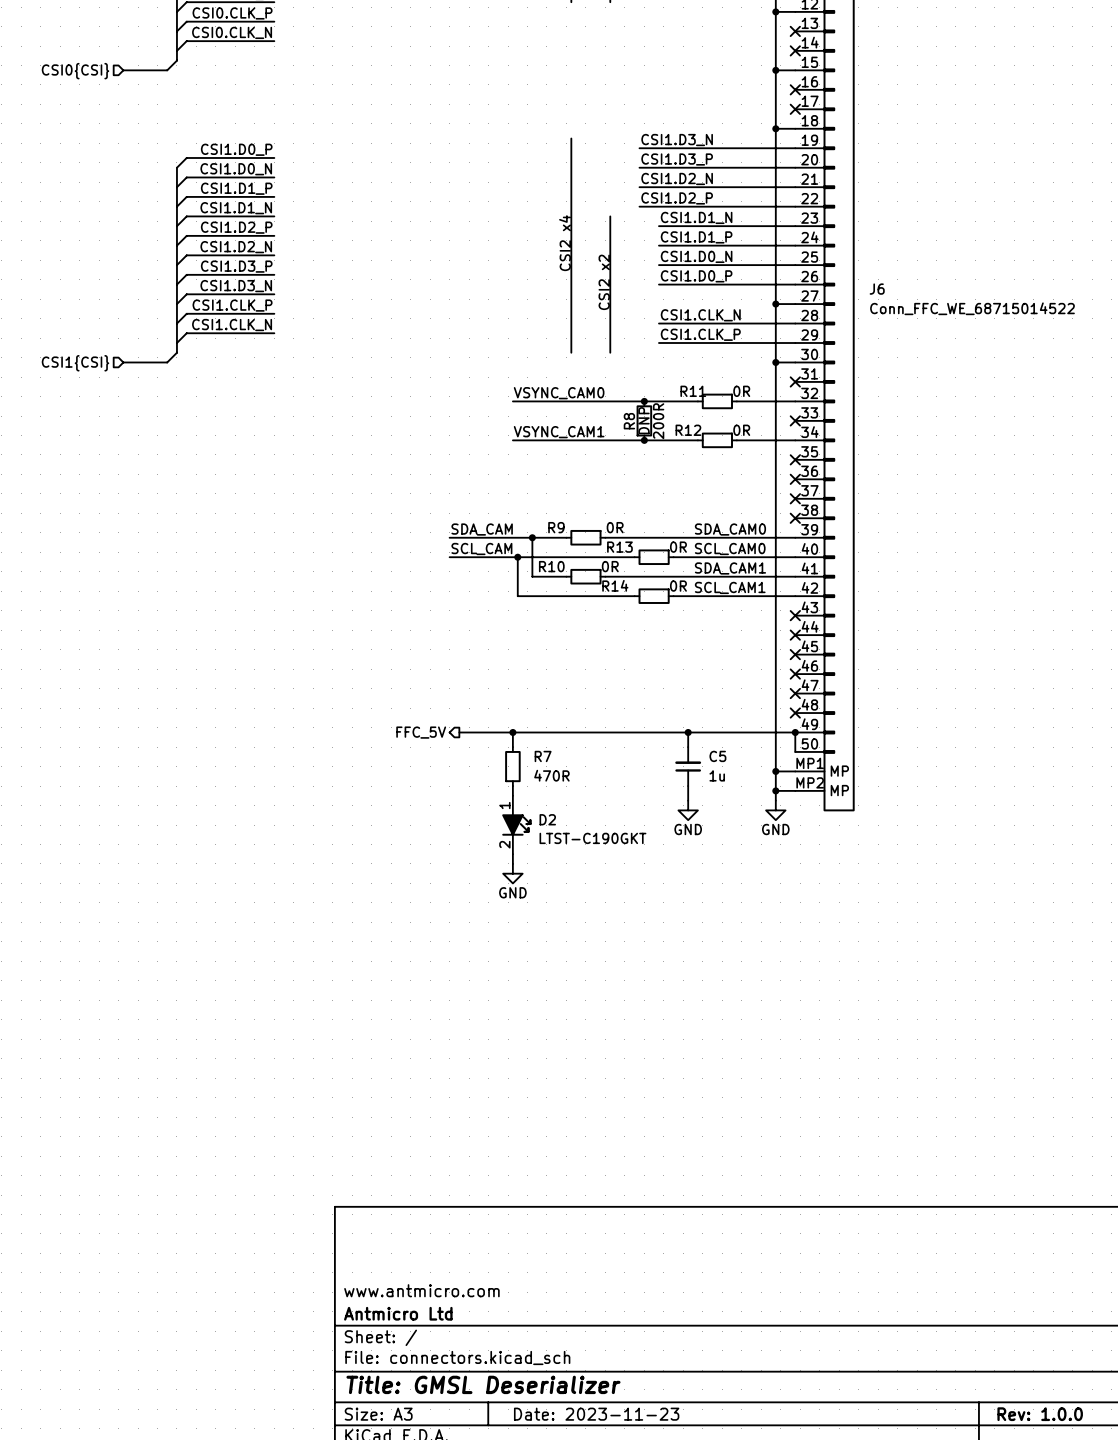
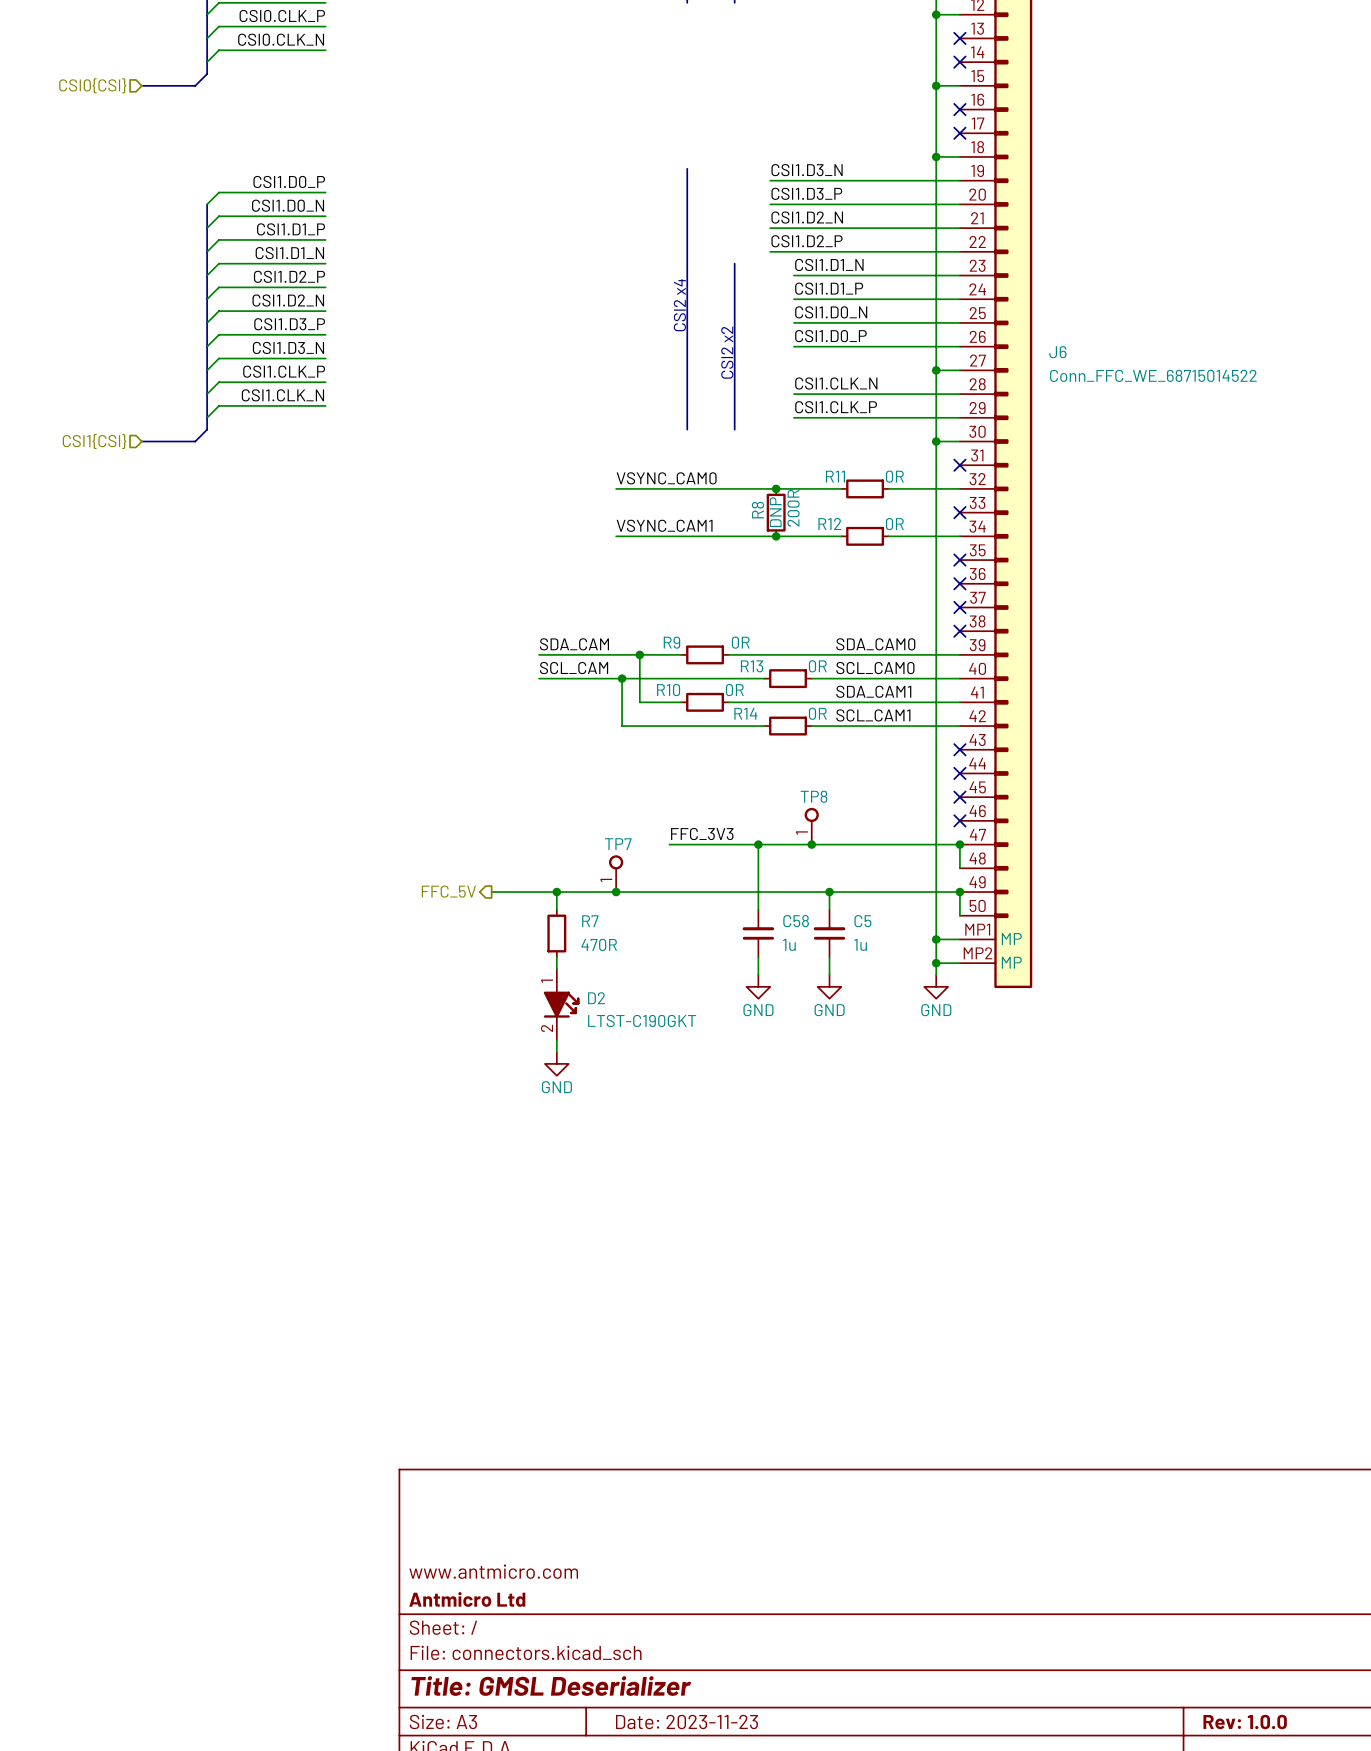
TP8: none -> (811, 826)
label: none -> FFC_3V3 (702, 834)
wire: none -> (669, 844) (959, 844) (959, 868)
wire: none -> (758, 844) (758, 909)
junction: none -> (758, 844)
junction: none -> (811, 844)
no-connect mark: (795, 693) -> none
junction: none -> (959, 844)
no-connect mark: (795, 713) -> none
TP7: none -> (616, 873)
wire: none -> (491, 892) (550, 892)
hierarchical label position: FFC_5V (421, 732) -> FFC_5V (448, 891)
junction: none -> (556, 892)
wire: (512, 732) (512, 747) -> (556, 892) (556, 909)
R7 position: (512, 766) -> (556, 933)
C58: none -> (758, 933)
wire: (512, 786) (512, 795) -> (556, 957) (556, 969)
wire: none -> (758, 957) (758, 975)
power symbol: none -> GND (758, 986)
D2 position: (516, 825) -> (561, 1004)
wire: (512, 854) (512, 863) -> (556, 1040) (556, 1052)
power symbol position: GND (512, 873) -> GND (556, 1063)

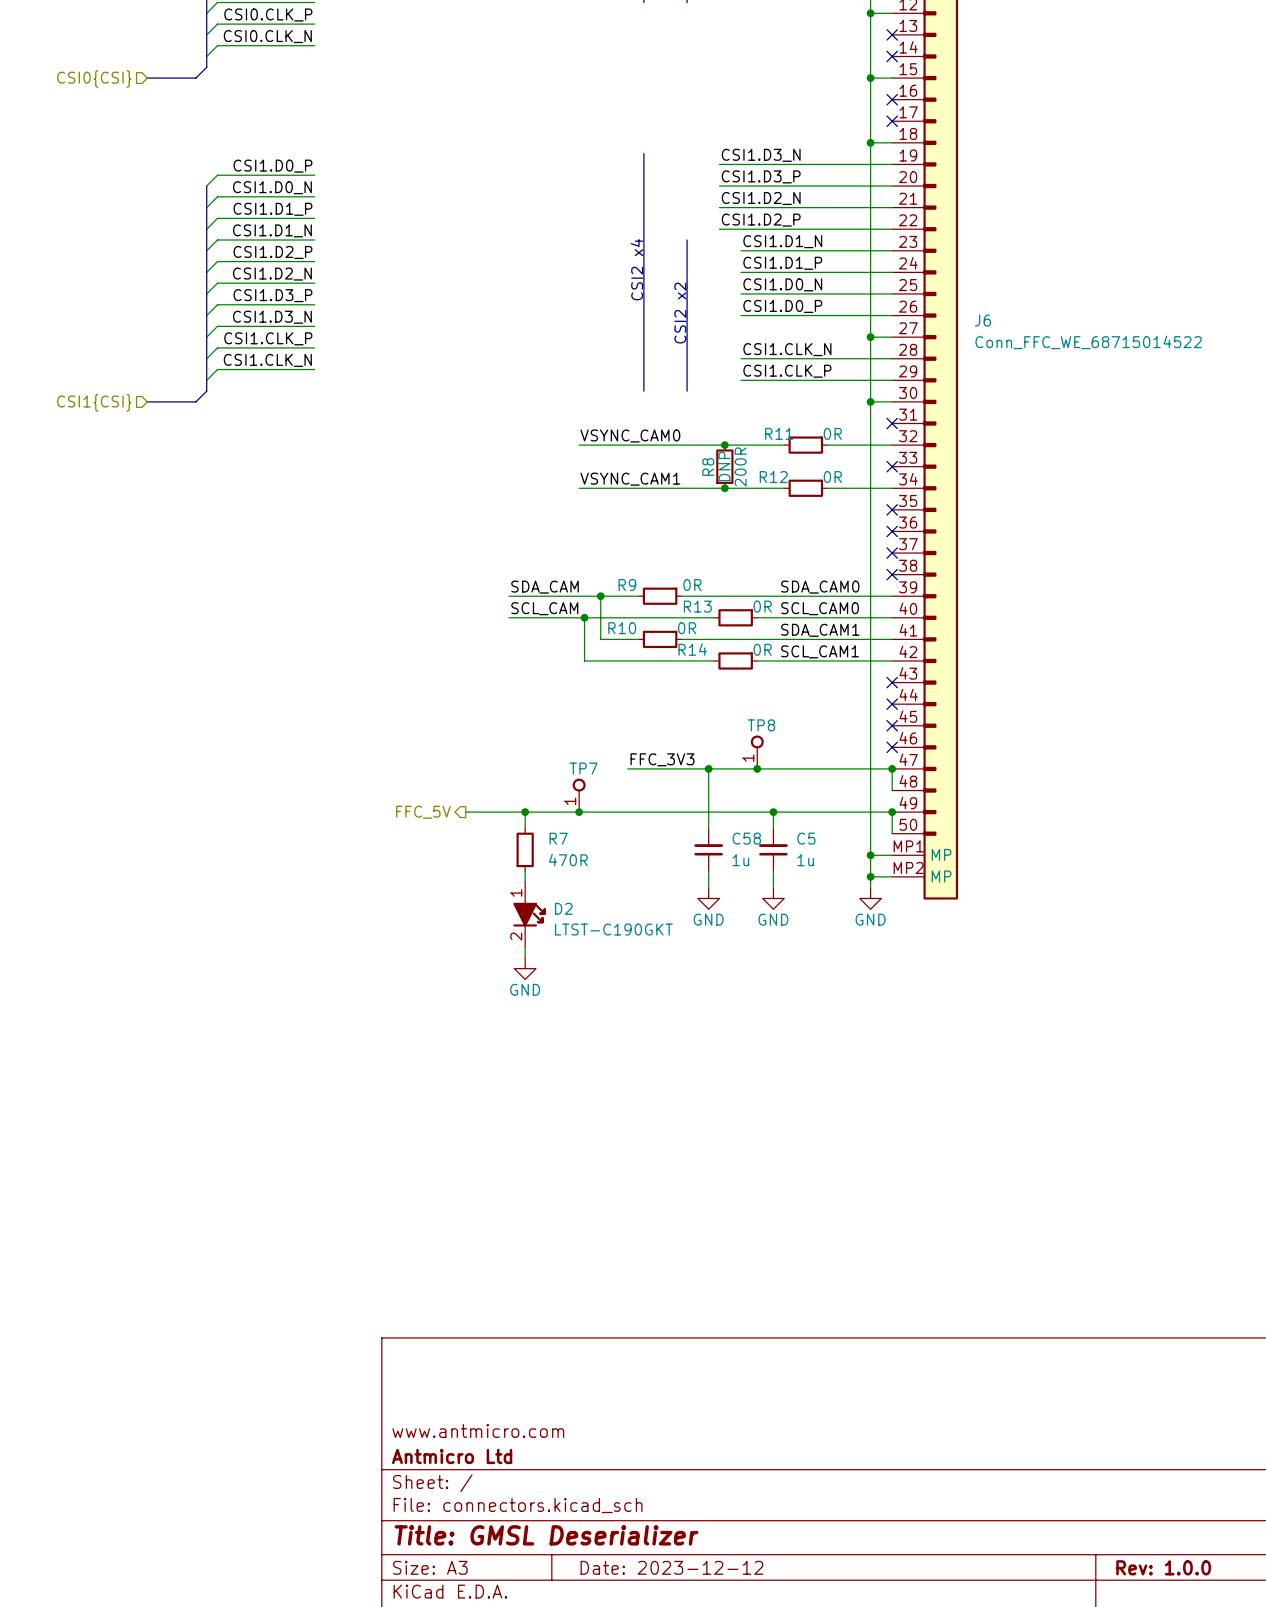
title block: Date: 2023-11-23 (686, 1721) -> Date: 2023-12-12 (671, 1567)

